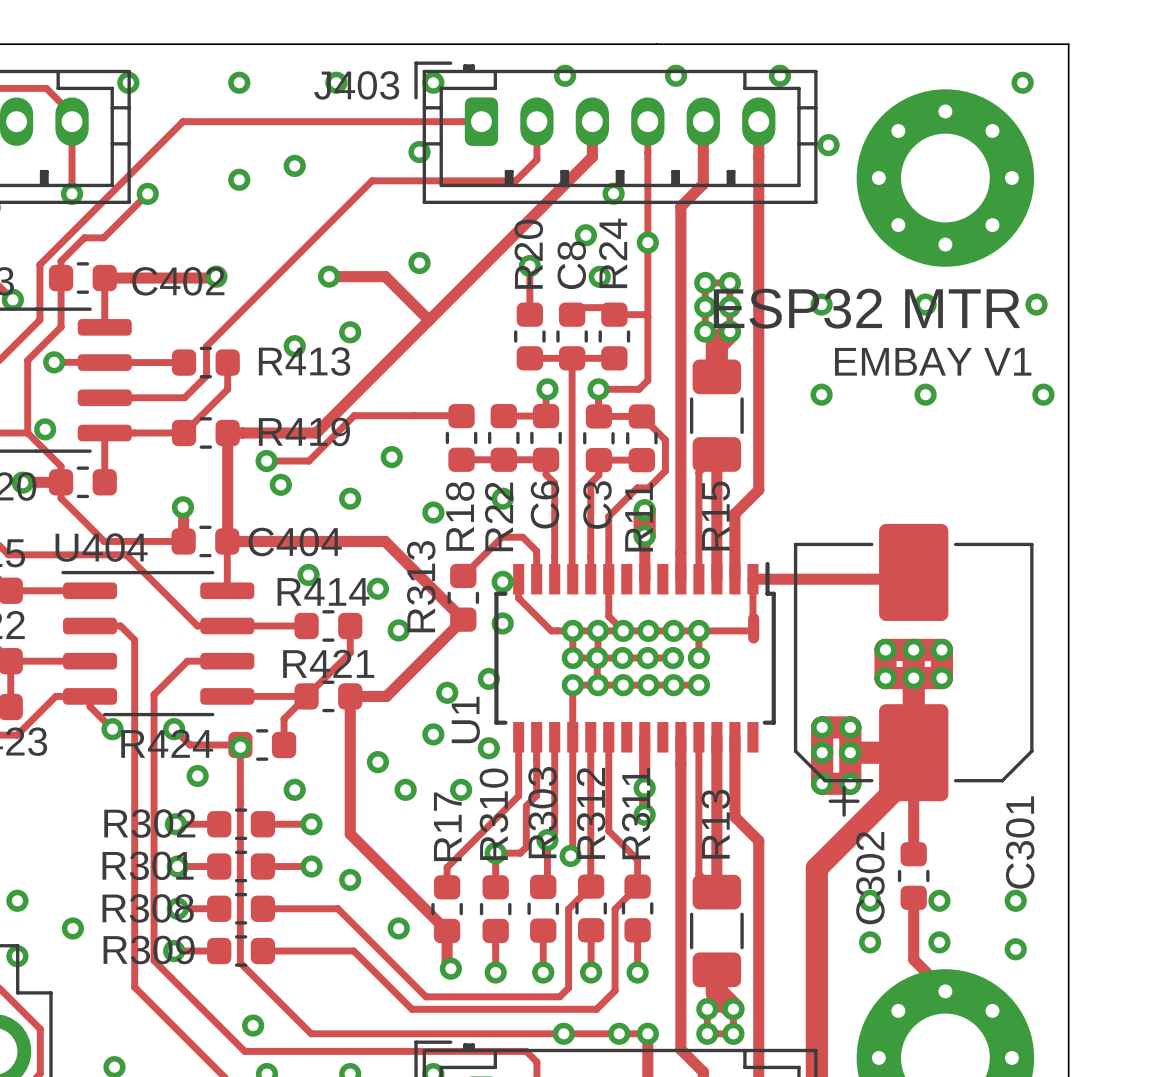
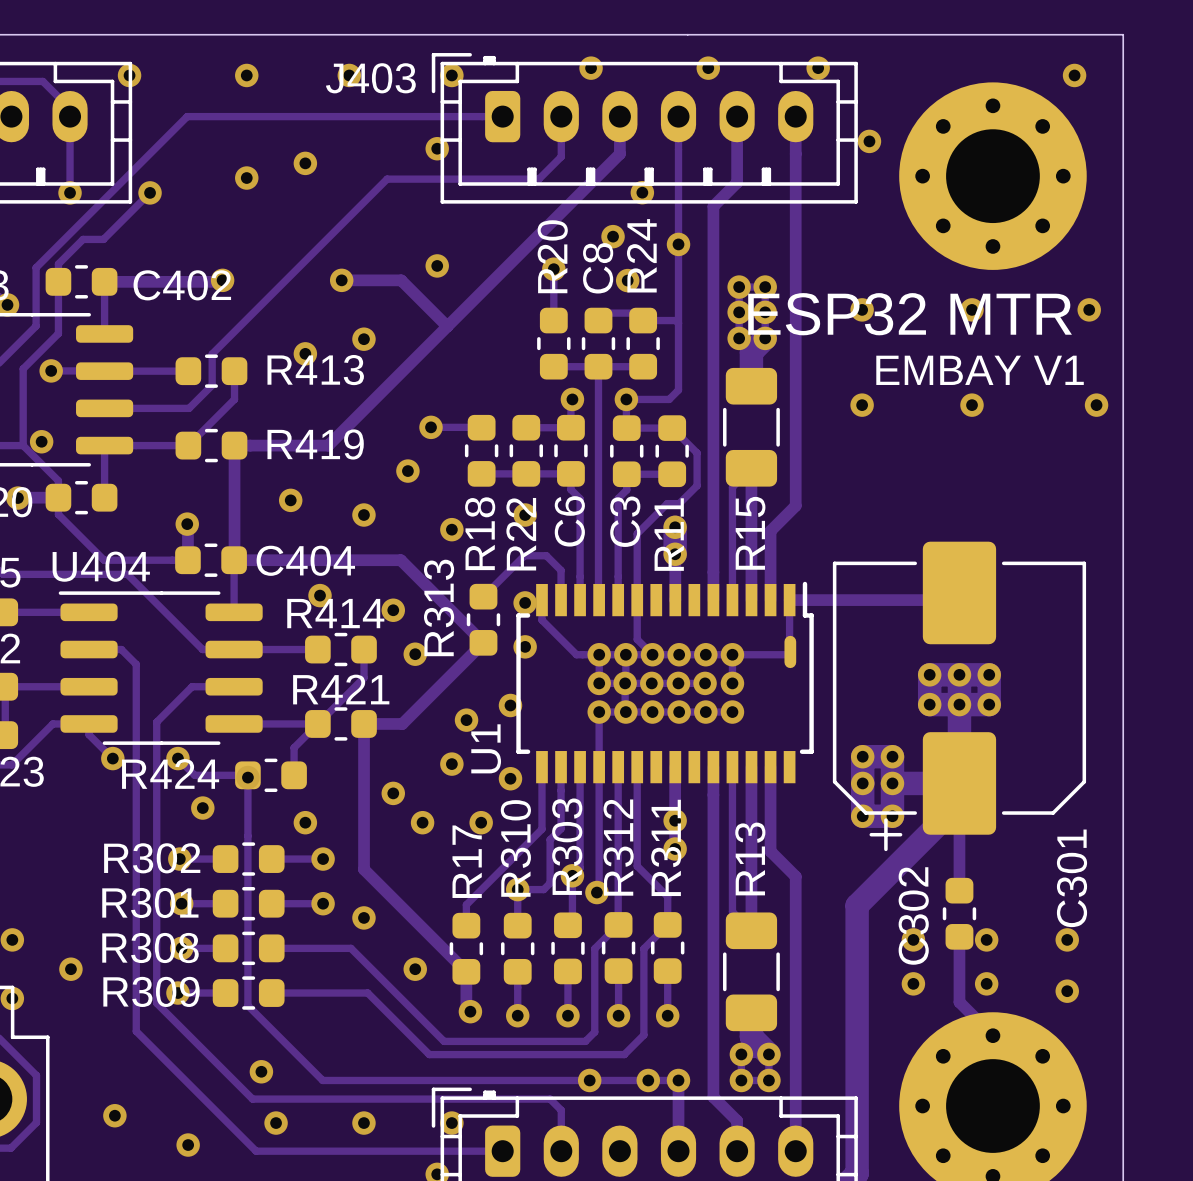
track: (413, 415) (354, 415) (308, 461) (266, 461) -> none
via position: (266, 461) -> (431, 427)

